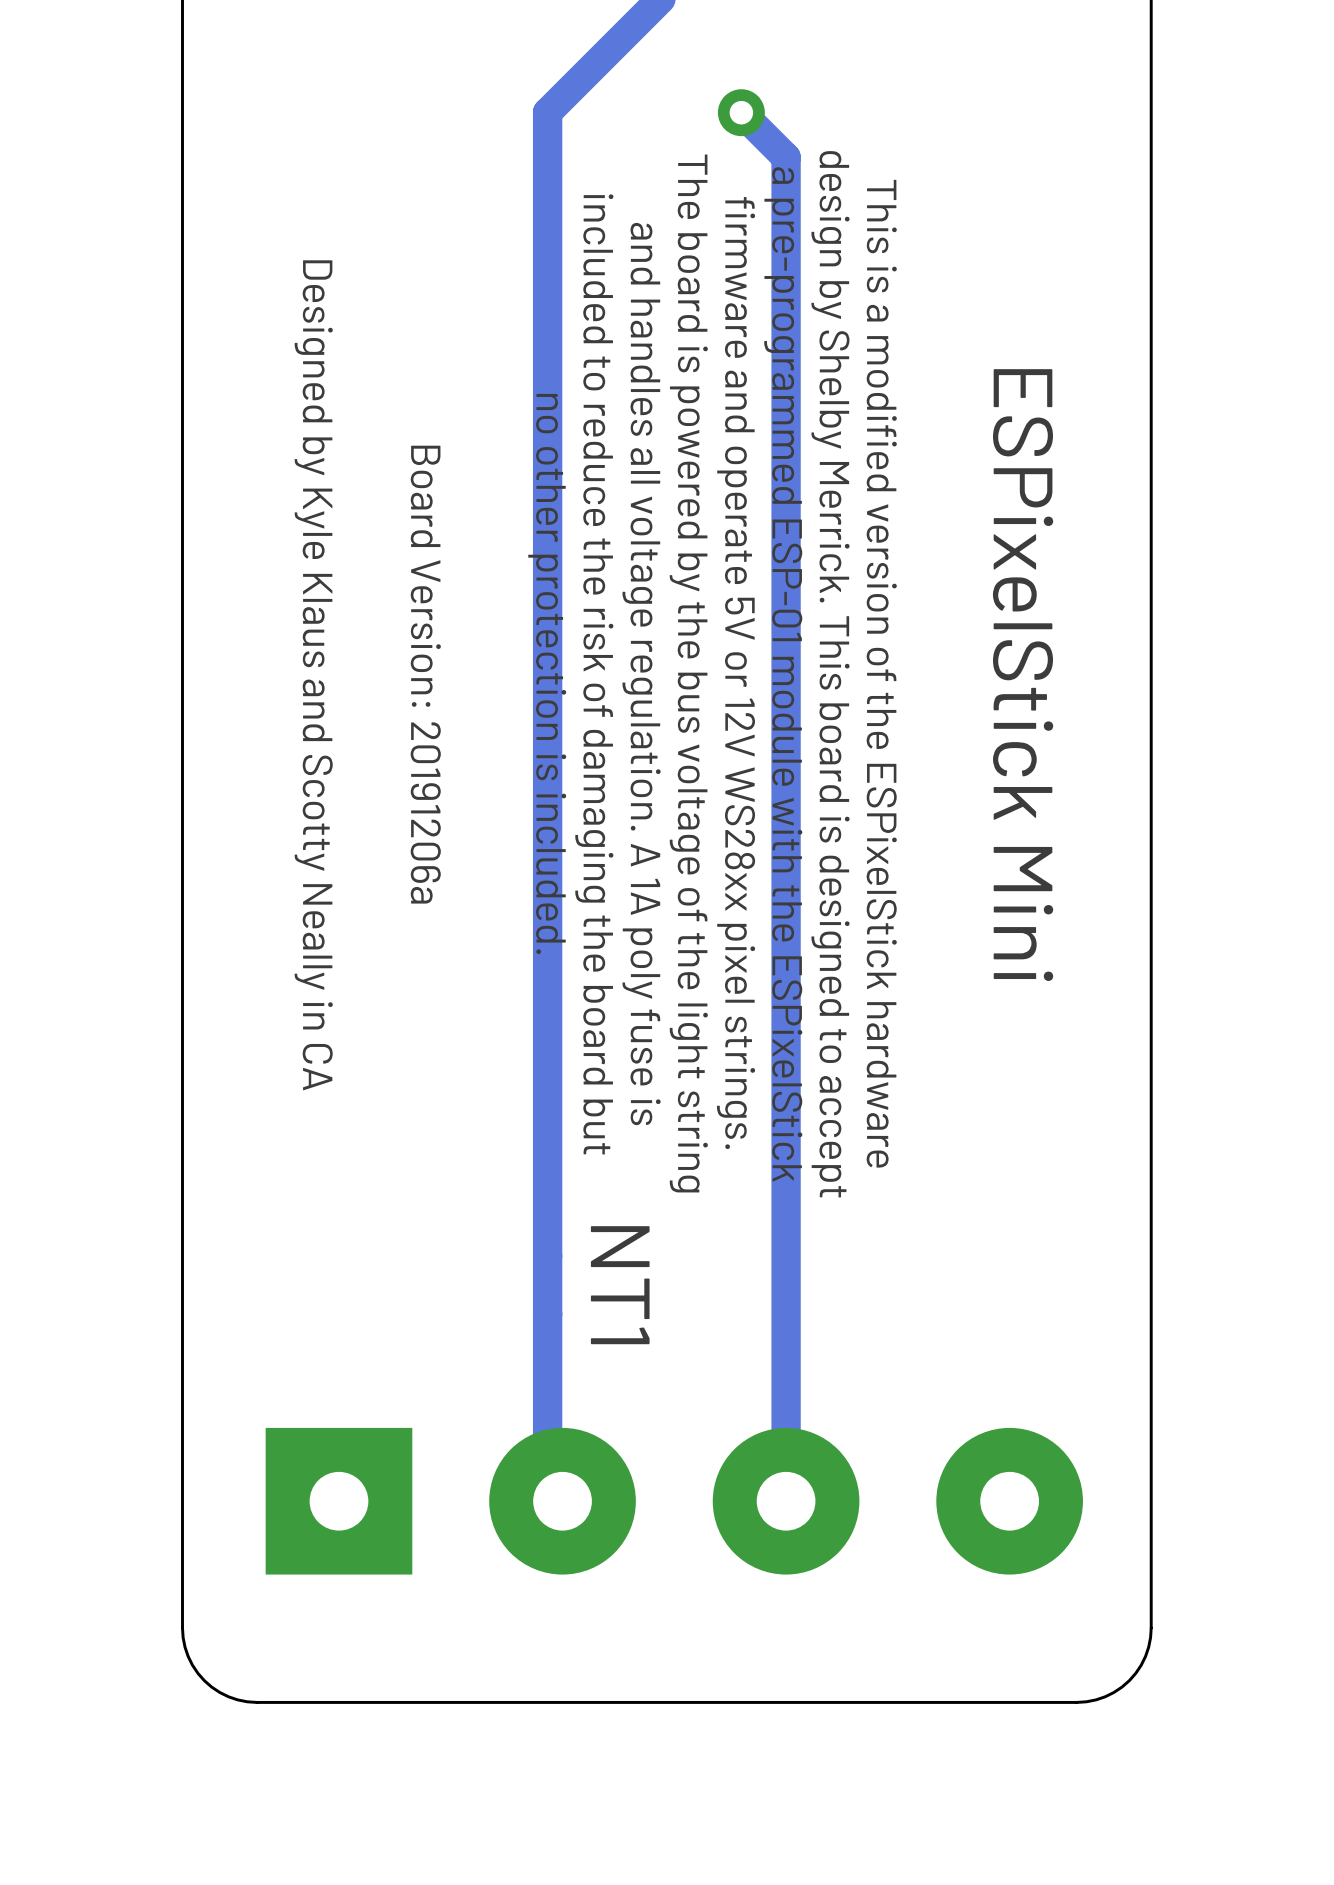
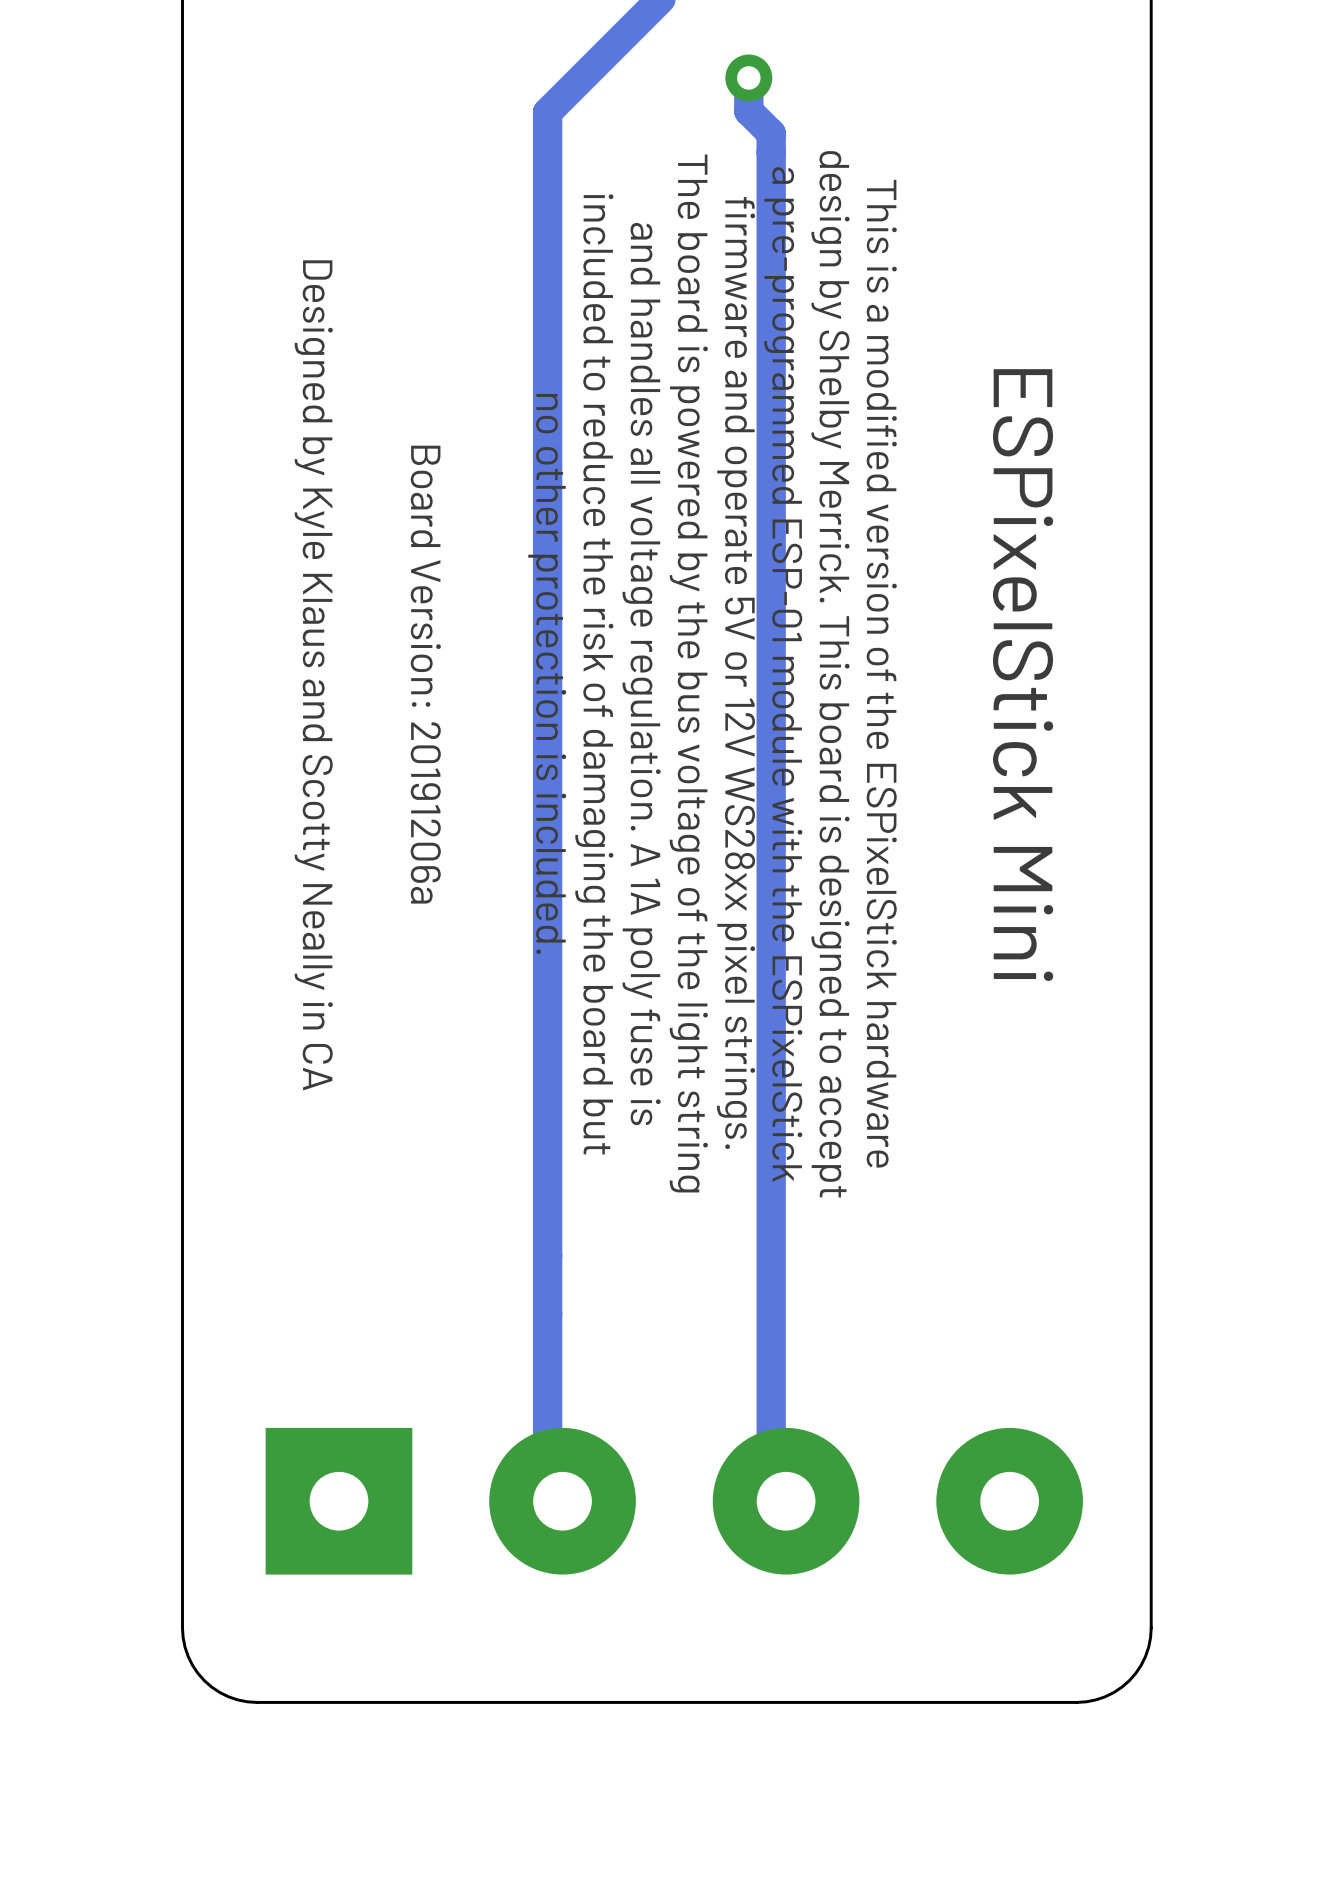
track: none -> (748, 77) (748, 111) (771, 133) (771, 1501)
track: (741, 112) (786, 157) (786, 1501) -> none
via position: (741, 112) -> (748, 77)
NT1 name: NT1 (620, 1285) -> none

